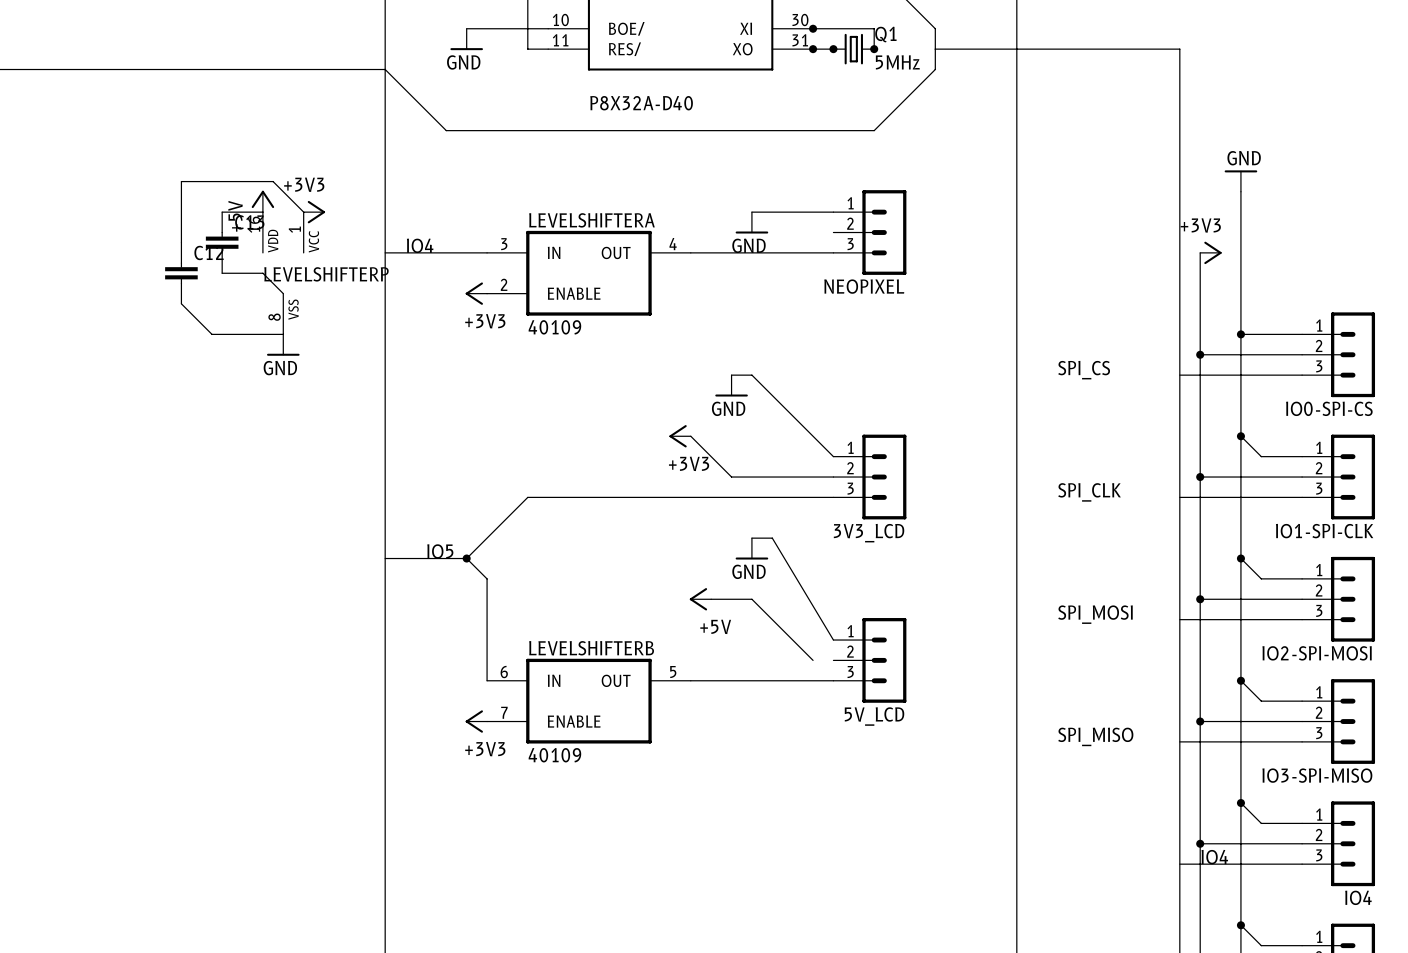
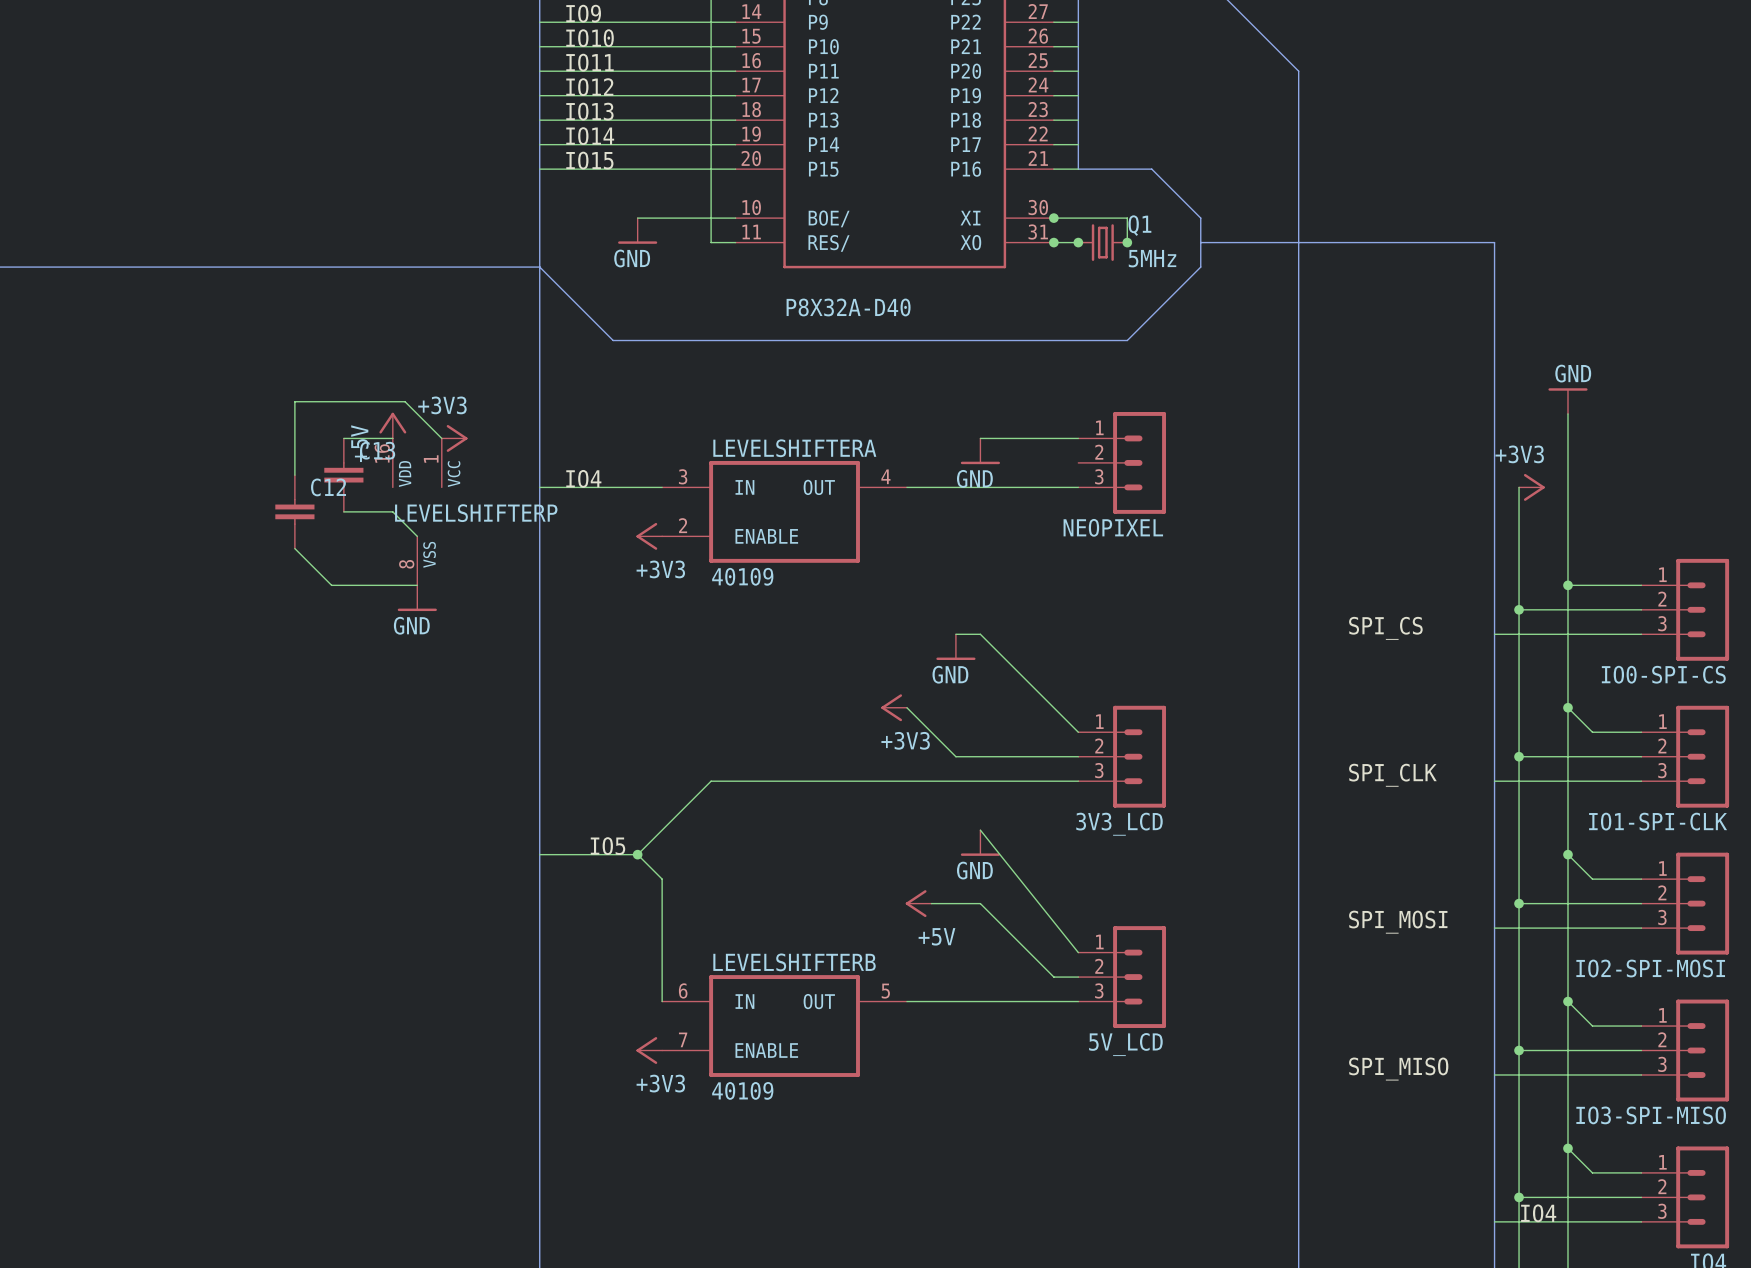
wire: (751, 538) (772, 538) (833, 640) -> (980, 830) (1078, 952)
wire: none -> (1053, 977) (1078, 977)

